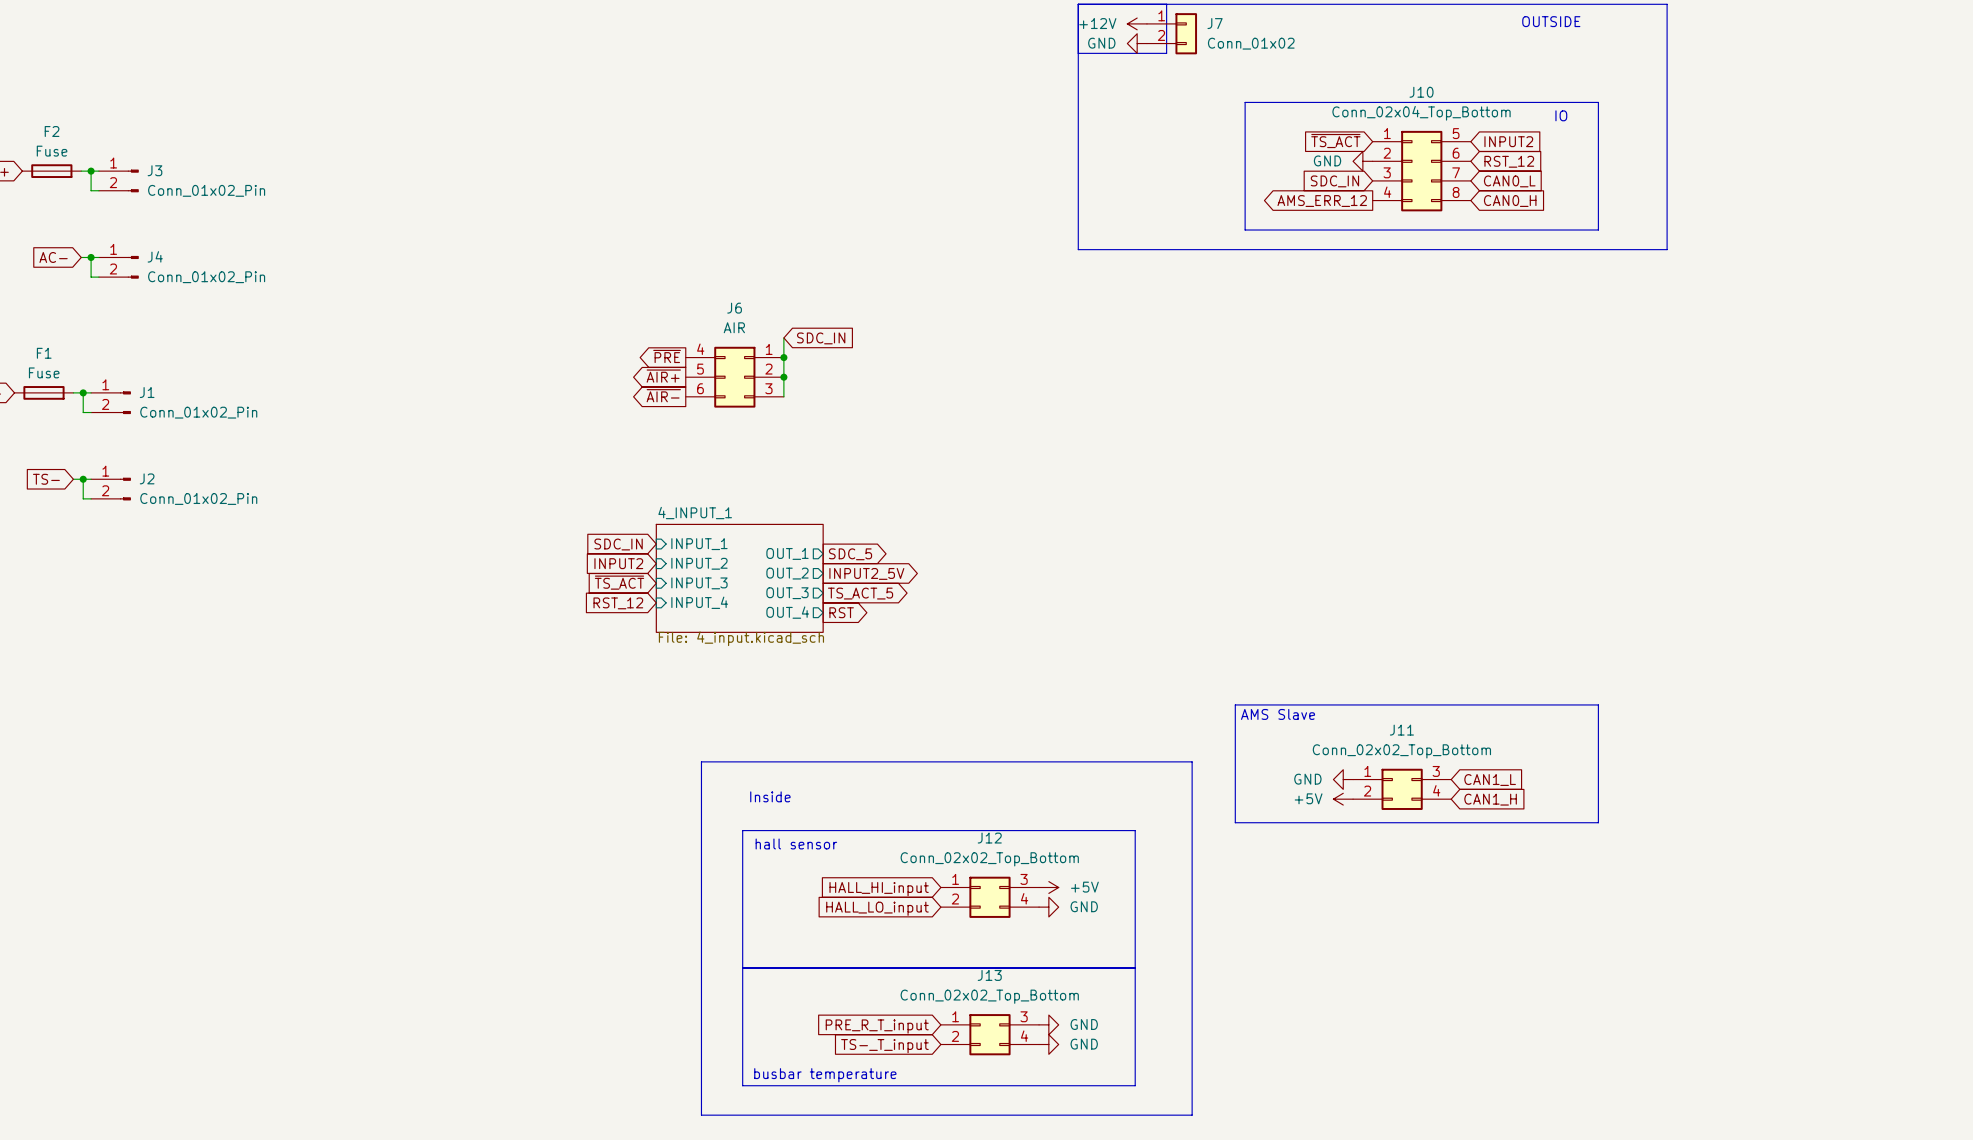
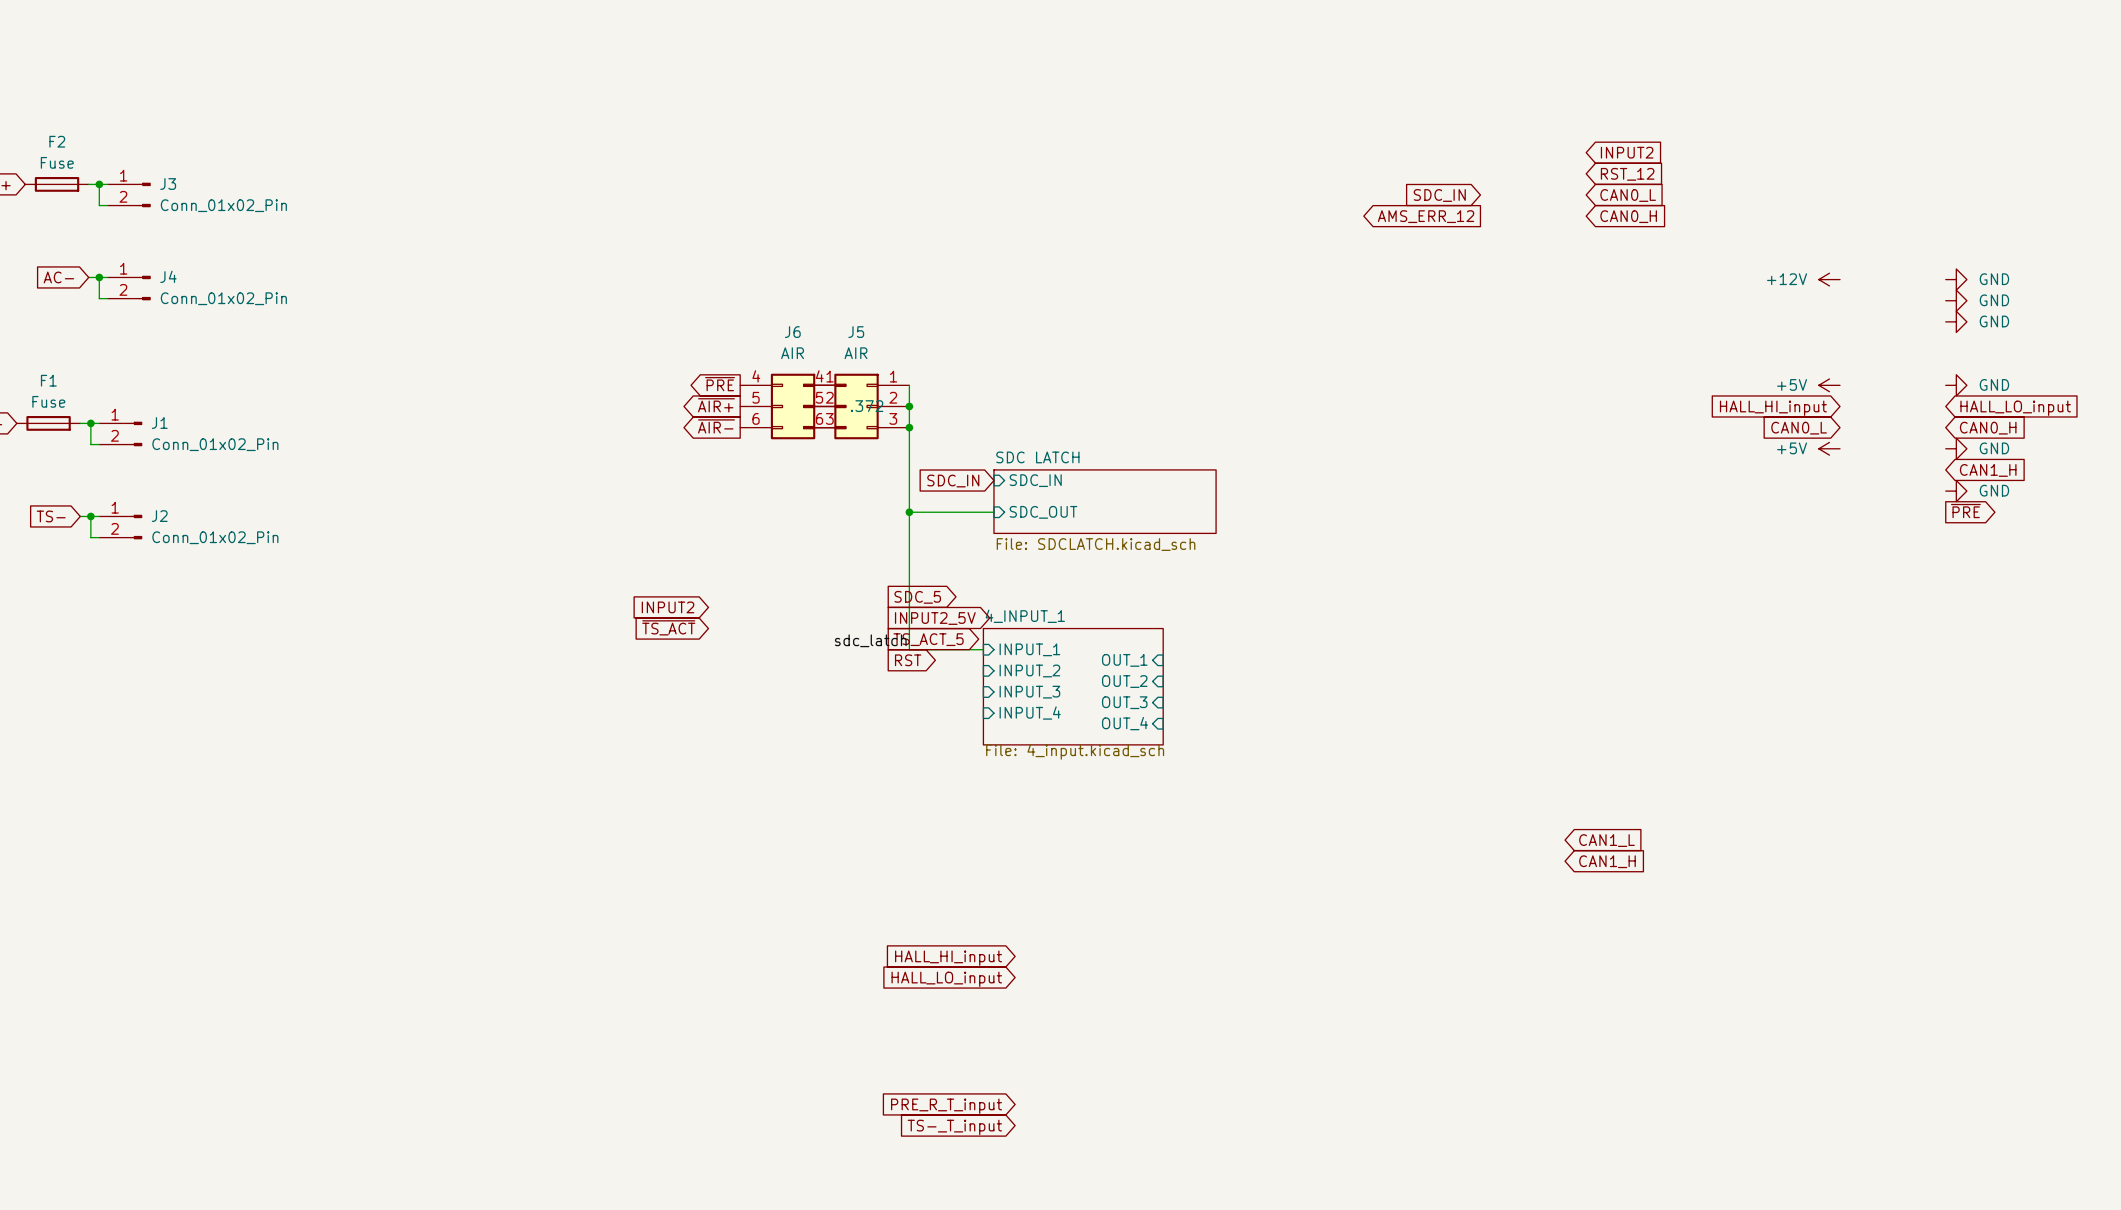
line: (1078, 4) (1667, 4) (1667, 249) (1078, 249) (1078, 4) -> none
line: (1166, 4) (1166, 53) (1078, 53) -> none
text: OUTSIDE (1551, 21) -> none
power symbol: +12V (1137, 23) -> none
J7: Conn_01x02 (1172, 33) -> none
power symbol: GND (1137, 43) -> none
line: (1245, 102) (1598, 102) (1598, 230) (1245, 230) (1245, 102) -> none
text: IO (1561, 115) -> none
global label: ~{TS_ACT} (1335, 141) -> none
power symbol: GND (1362, 161) -> none
J10: Conn_02x04_Top_Bottom (1421, 171) -> none
power symbol: none -> +12V (1829, 279)
power symbol: none -> GND (1956, 279)
power symbol: none -> GND (1956, 300)
power symbol: none -> GND (1956, 321)
global label: SDC_IN (821, 338) -> none
junction: (783, 357) -> none
wire: none -> (909, 385) (909, 649) (983, 649)
power symbol: none -> +5V (1829, 385)
power symbol: none -> GND (1956, 385)
junction: (783, 377) -> none
J5: none -> AIR (856, 406)
junction: none -> (909, 406)
global label: none -> HALL_HI_input (1773, 408)
global label: none -> HALL_LO_input (2015, 408)
junction: none -> (909, 427)
global label: none -> CAN0_L (1799, 428)
global label: none -> CAN0_H (1988, 428)
power symbol: none -> +5V (1829, 448)
power symbol: none -> GND (1956, 448)
global label: none -> CAN1_H (1988, 470)
sheet pin: none -> SDC_IN (1035, 480)
global label: none -> SDC_IN (953, 481)
power symbol: none -> GND (1956, 491)
sheet SDC LATCH: none -> File: SDCLATCH.kicad_sch (1105, 501)
global label: none -> ~{PRE} (1965, 511)
wire: none -> (909, 512) (993, 512)
junction: none -> (909, 512)
sheet pin: none -> SDC_OUT (1043, 512)
global label: SDC_IN (618, 544) -> none
sheet pin: INPUT_1 (699, 544) -> none
sheet pin: OUT_1 (787, 553) -> none
sheet pin: INPUT_2 (699, 563) -> none
sheet pin: OUT_2 (787, 573) -> none
sheet 4_INPUT_1 position: (739, 578) -> (1073, 686)
sheet pin: INPUT_3 (699, 583) -> none
sheet pin: OUT_3 (787, 593) -> none
label: none -> sdc_latch (870, 640)
sheet pin: INPUT_4 (699, 602) -> none
global label: RST_12 (618, 603) -> none
sheet pin: none -> INPUT_1 (1029, 649)
sheet pin: OUT_4 (787, 612) -> none
sheet pin: none -> OUT_1 (1124, 660)
sheet pin: none -> INPUT_2 (1029, 670)
sheet pin: none -> OUT_2 (1124, 681)
sheet pin: none -> INPUT_3 (1029, 692)
sheet pin: none -> OUT_3 (1124, 702)
sheet pin: none -> INPUT_4 (1030, 713)
sheet pin: none -> OUT_4 (1125, 723)
line: (1235, 704) (1598, 704) (1598, 822) (1235, 822) (1235, 704) -> none
text: AMS Slave (1278, 714) -> none
line: (701, 761) (1192, 761) (1192, 1115) (701, 1115) (701, 761) -> none
power symbol: GND (1343, 779) -> none
J11: Conn_02x02_Top_Bottom (1402, 789) -> none
text: Inside (770, 796) -> none
power symbol: +5V (1343, 799) -> none
line: (742, 830) (742, 1085) (1135, 1085) (1135, 830) (742, 830) -> none
text: hall sensor (796, 843) -> none
power symbol: +5V (1048, 887) -> none
J12: Conn_02x02_Top_Bottom (989, 897) -> none
power symbol: GND (1048, 907) -> none
line: (742, 967) (1135, 967) -> none
power symbol: GND (1048, 1024) -> none
J13: Conn_02x02_Top_Bottom (989, 1034) -> none
power symbol: GND (1048, 1044) -> none
text: busbar temperature (825, 1075) -> none

